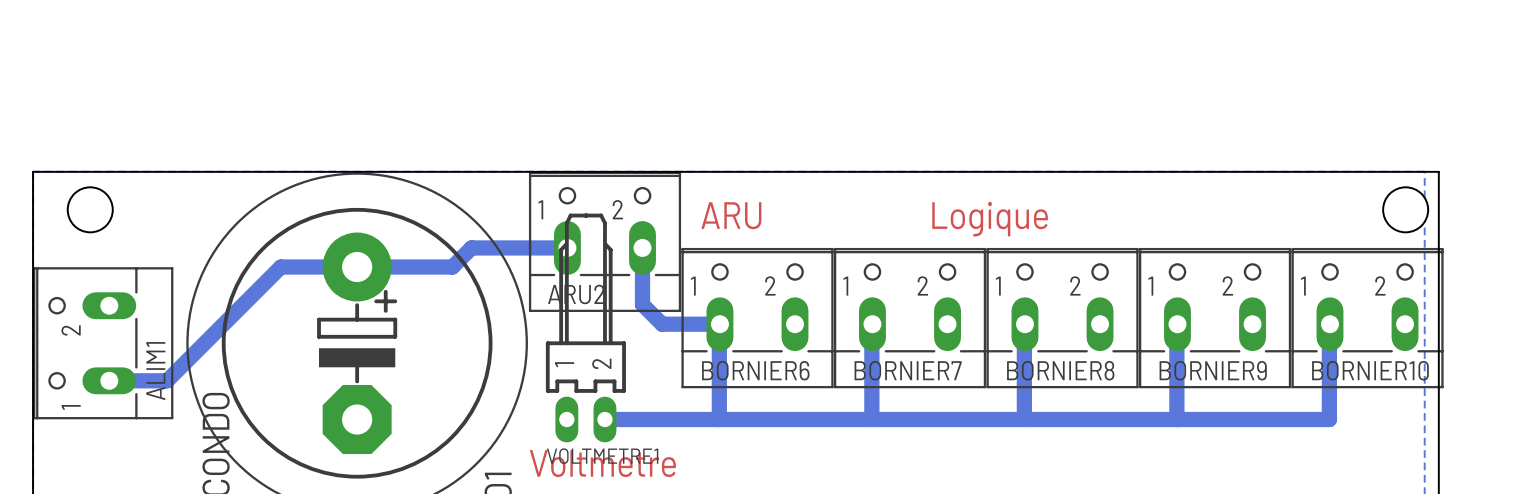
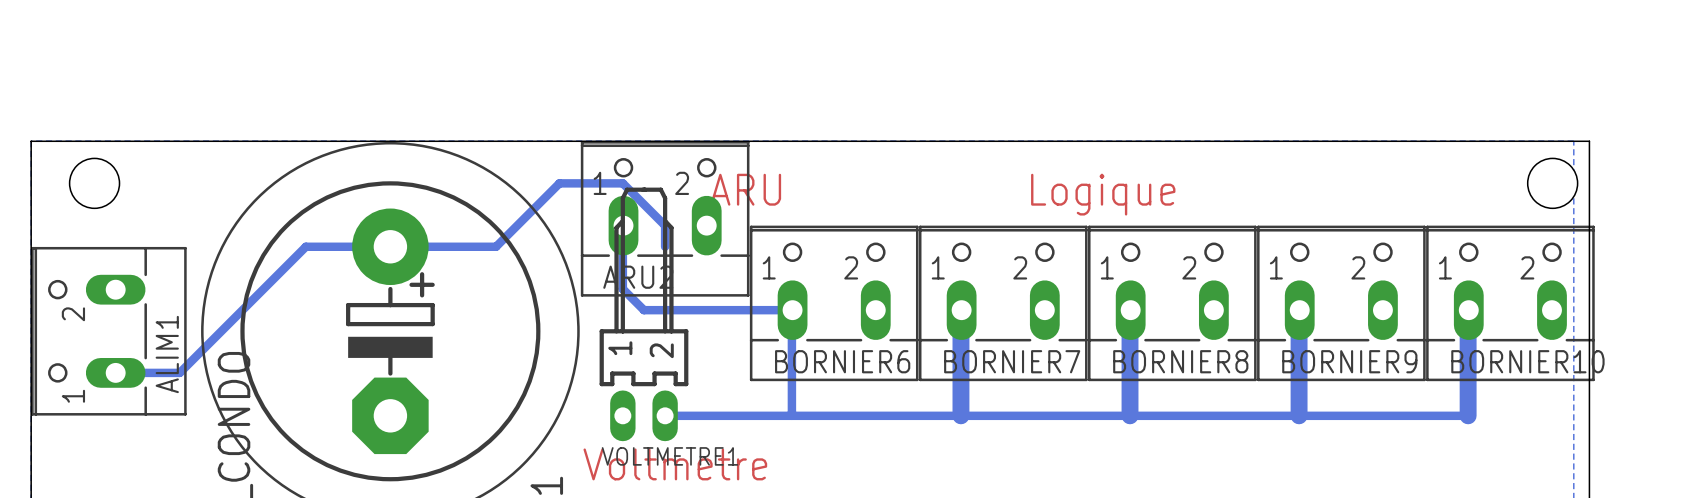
text position: ARU (731, 215) -> ARU (745, 189)
bottom track: (471, 247) (567, 247) -> (517, 225) (559, 183) (622, 183) (665, 225) (665, 246)
bottom track width: thick (471, 247) (452, 267) (280, 267) (167, 380) (109, 380) -> thin (517, 225) (496, 246) (305, 246) (179, 372) (115, 372)
bottom track: (642, 247) (642, 304) (662, 324) -> (622, 246) (622, 289) (643, 310) (728, 310)
bottom track width: thick (662, 324) (719, 324) -> thin (728, 310) (792, 310)
bottom track width: thick (719, 324) (719, 419) -> thin (791, 310) (791, 415)
bottom track width: thick (604, 419) (1329, 419) -> thin (665, 415) (1468, 415)

